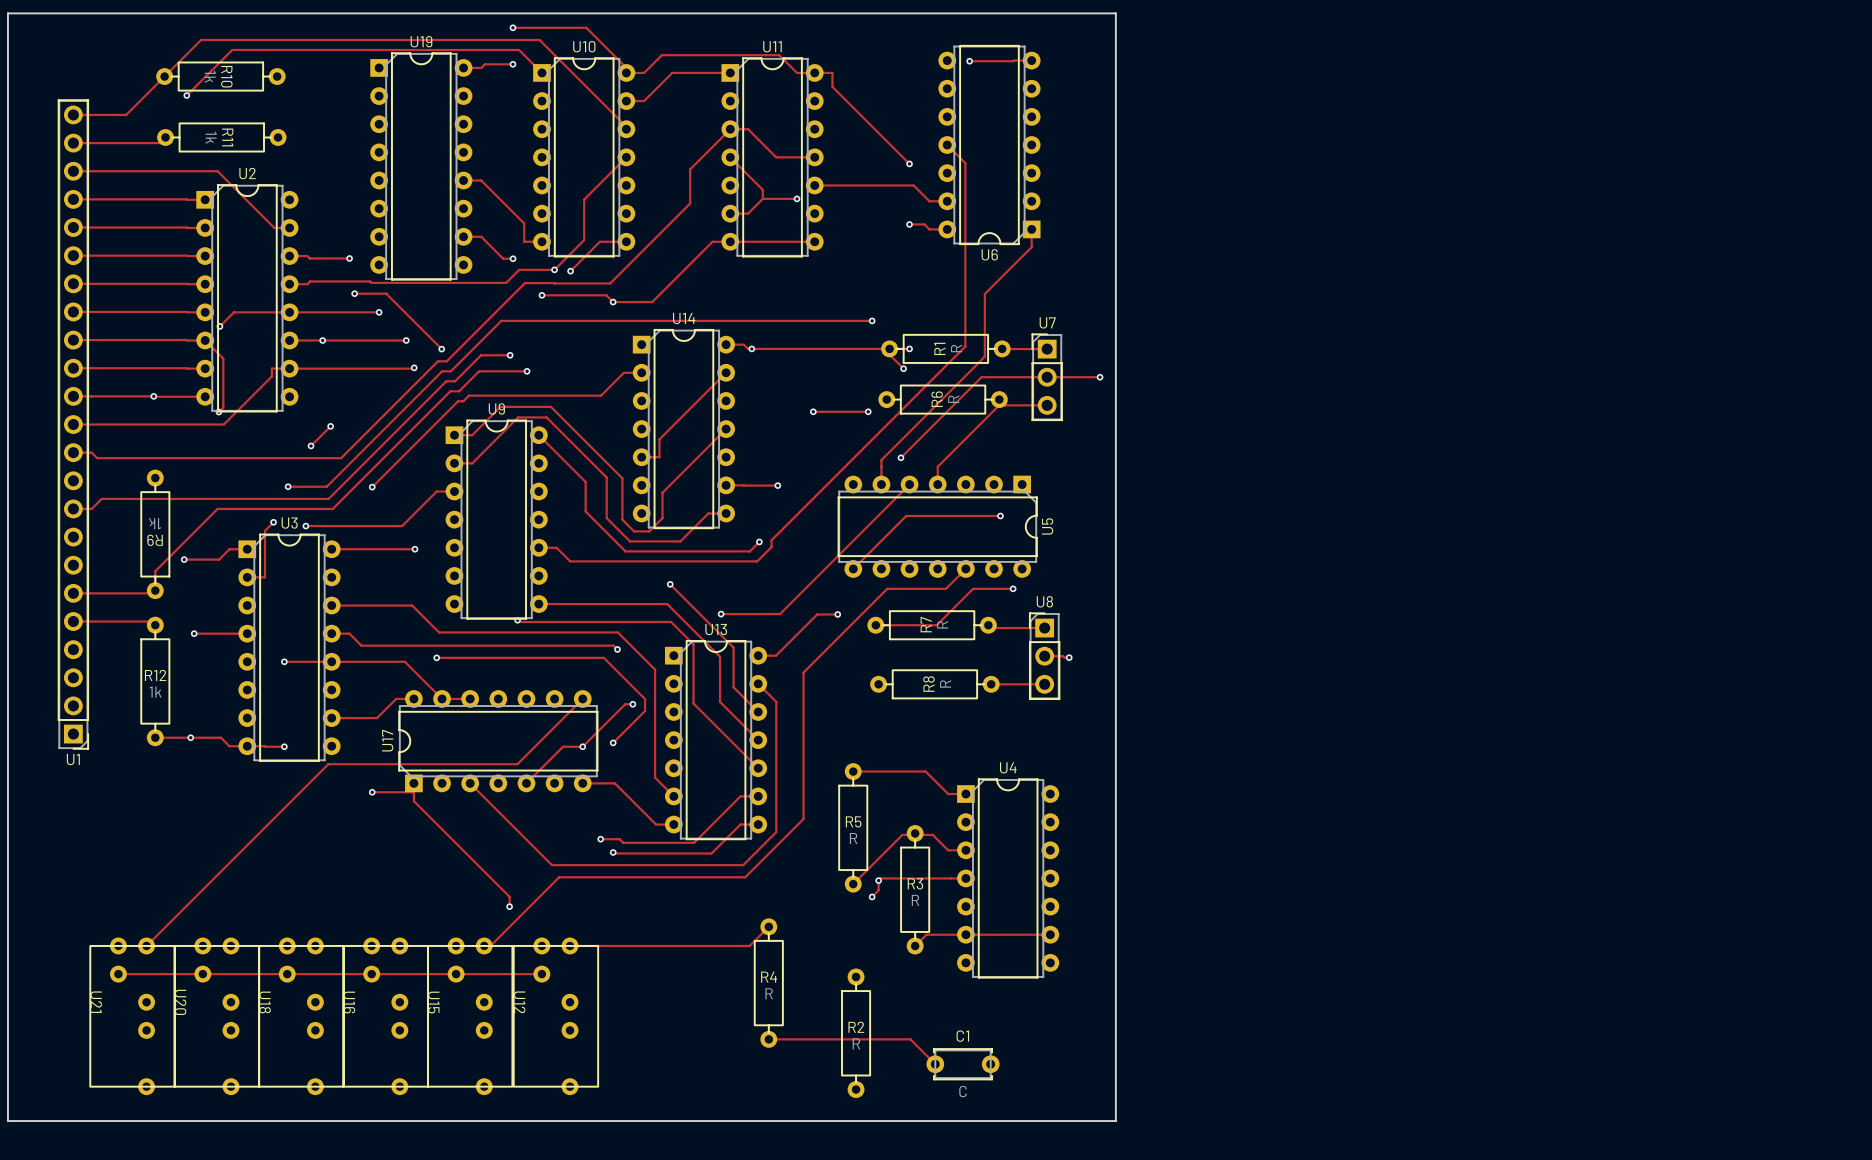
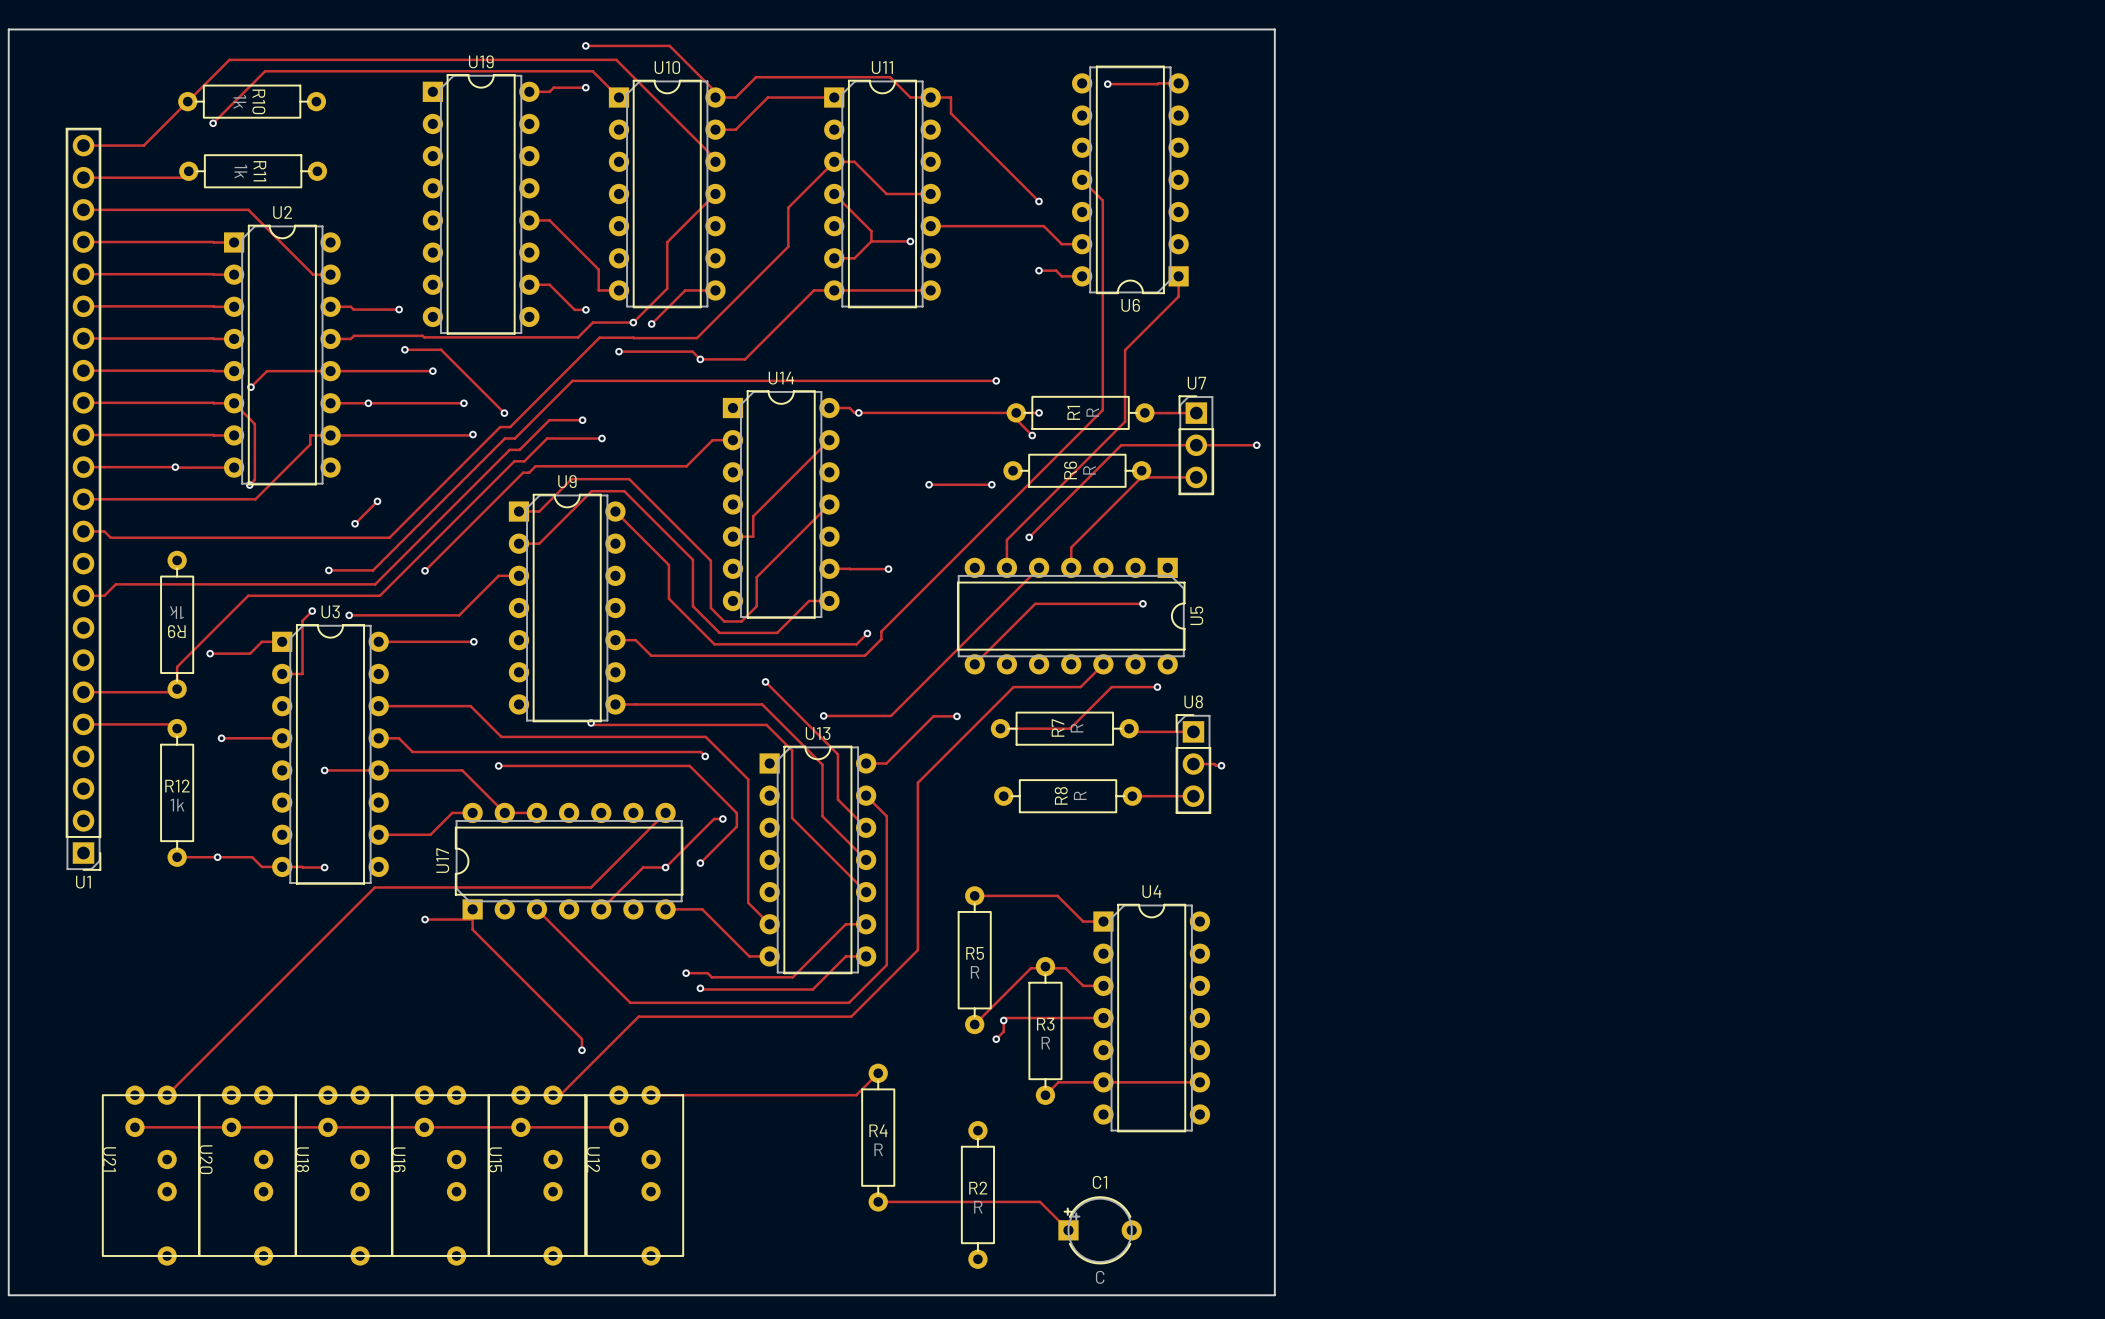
C1 footprint: [926, 1048, 1000, 1081] -> [1058, 1196, 1142, 1265]

